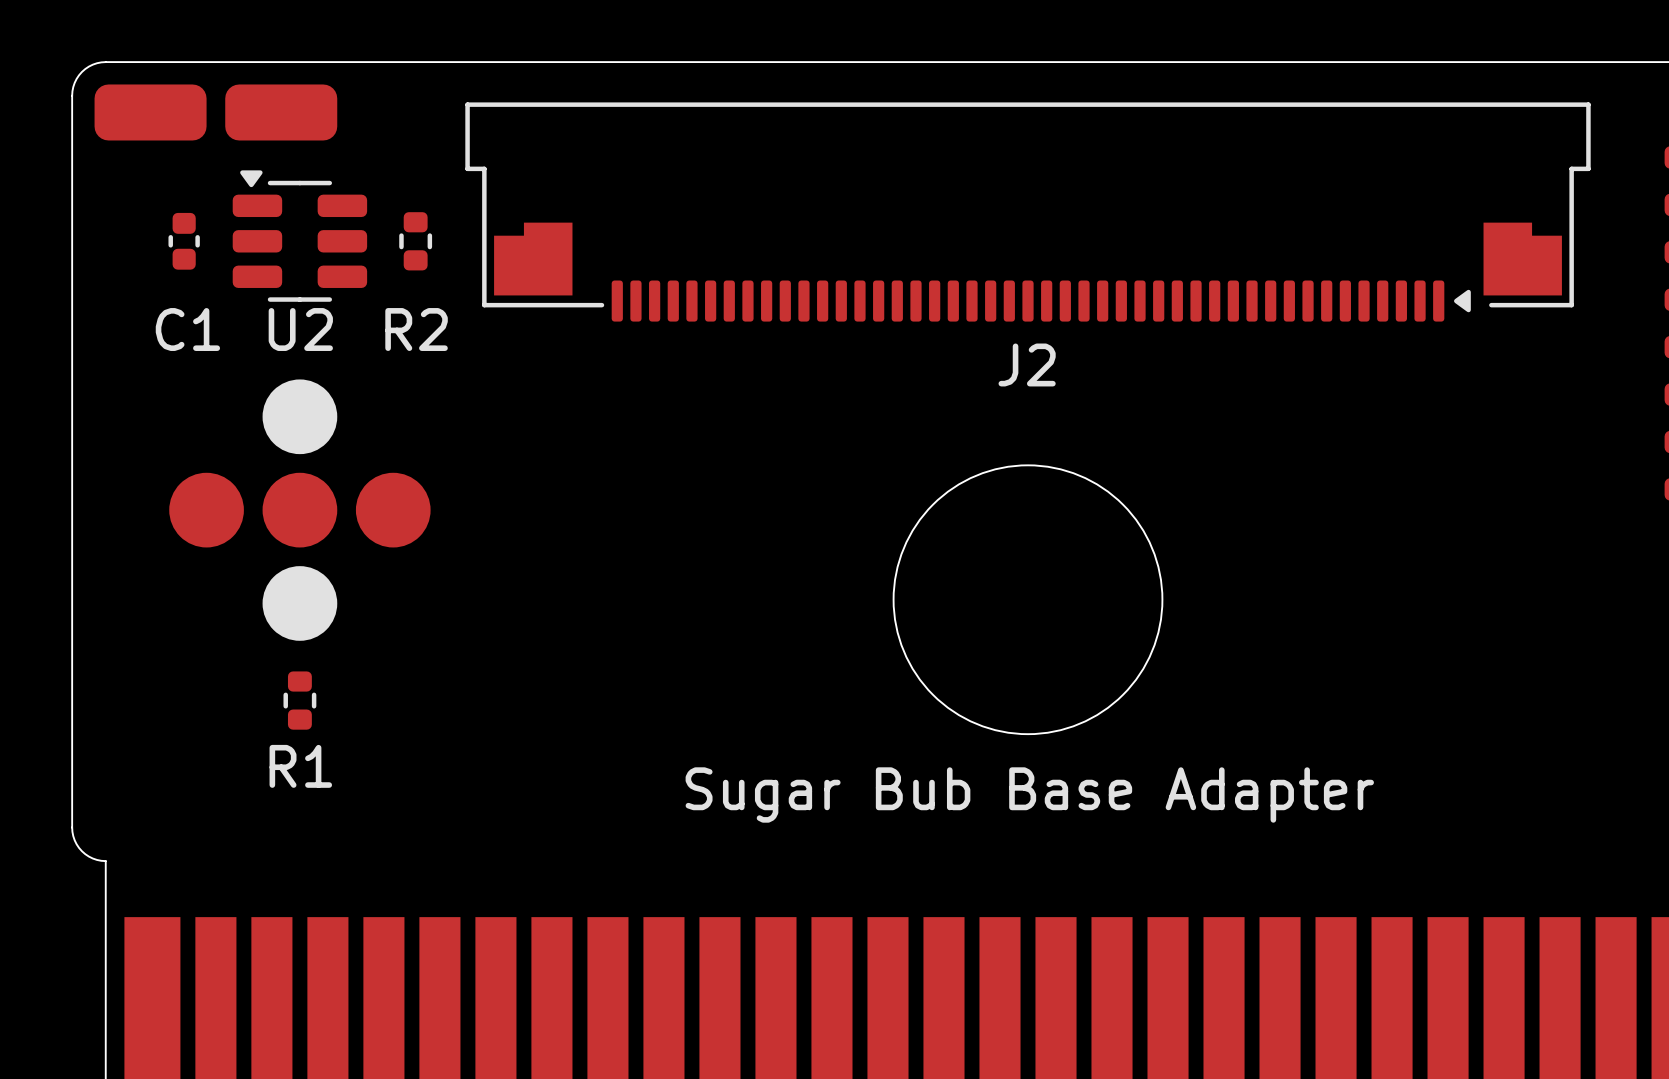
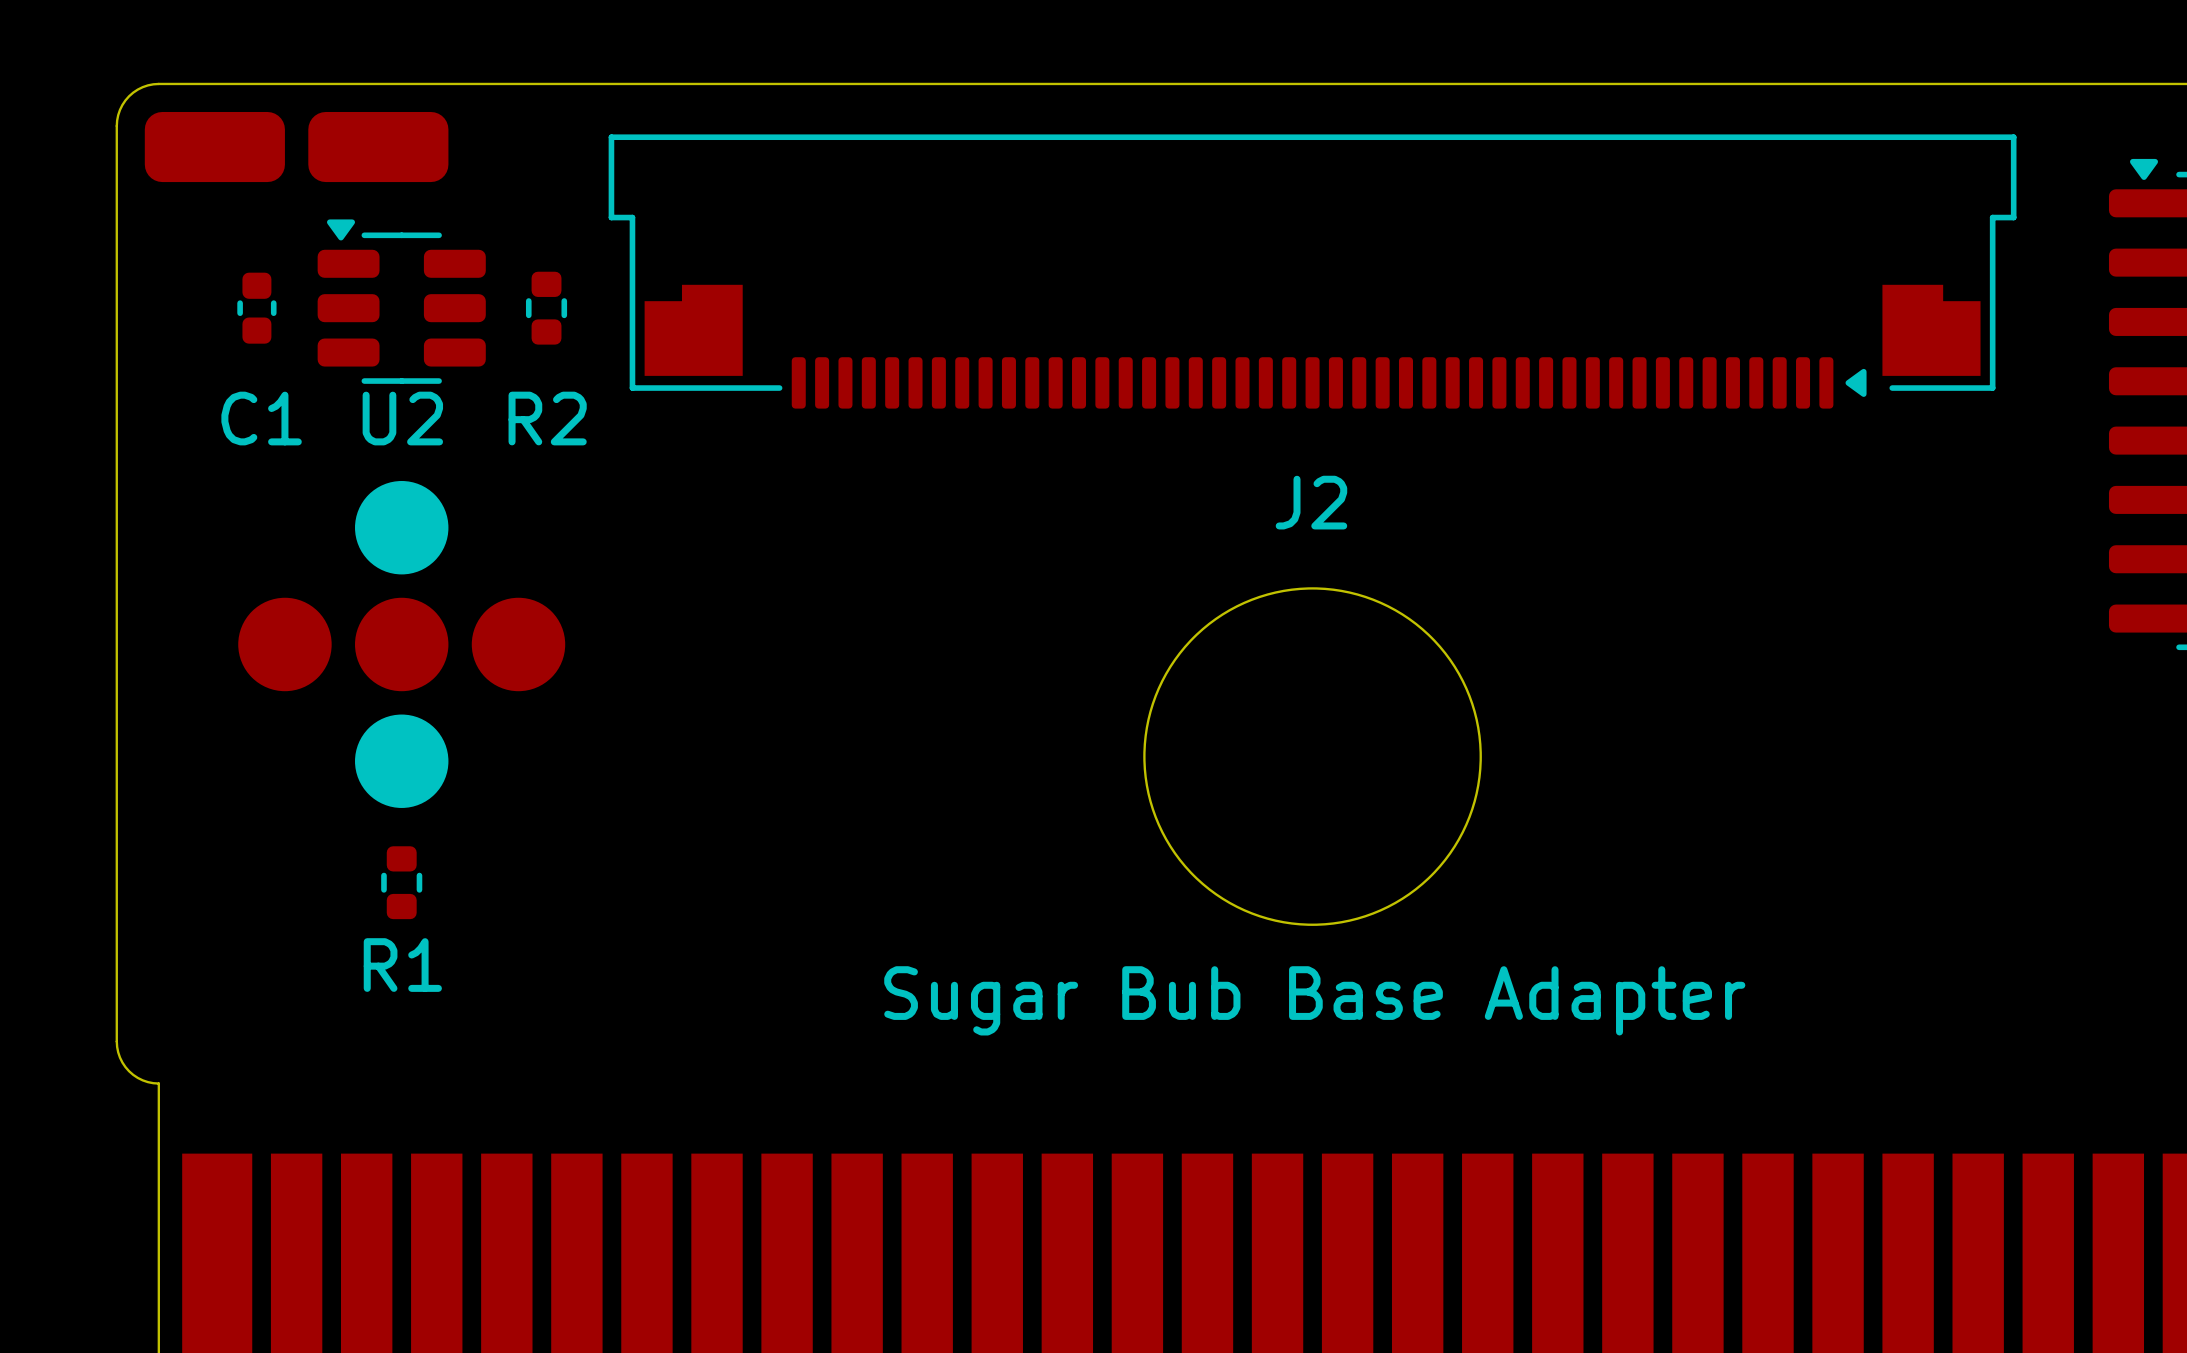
J2 name position: J2 (1027, 364) -> J2 (1311, 502)

